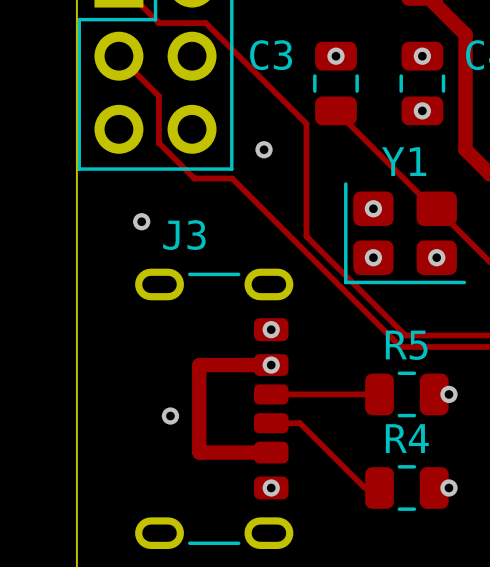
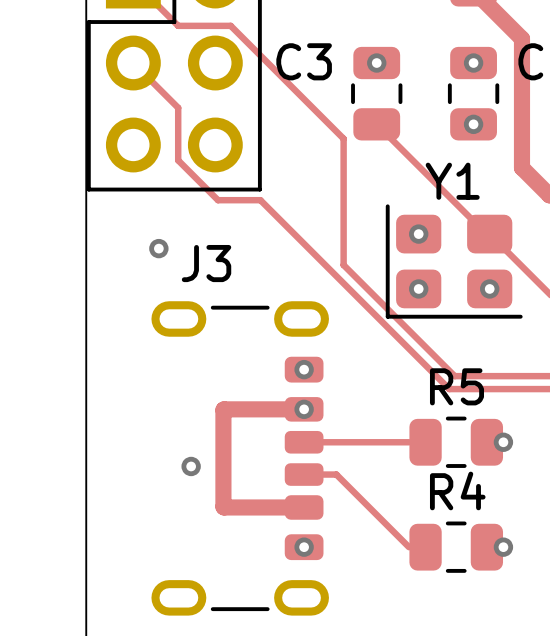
via: (264, 149) -> none

